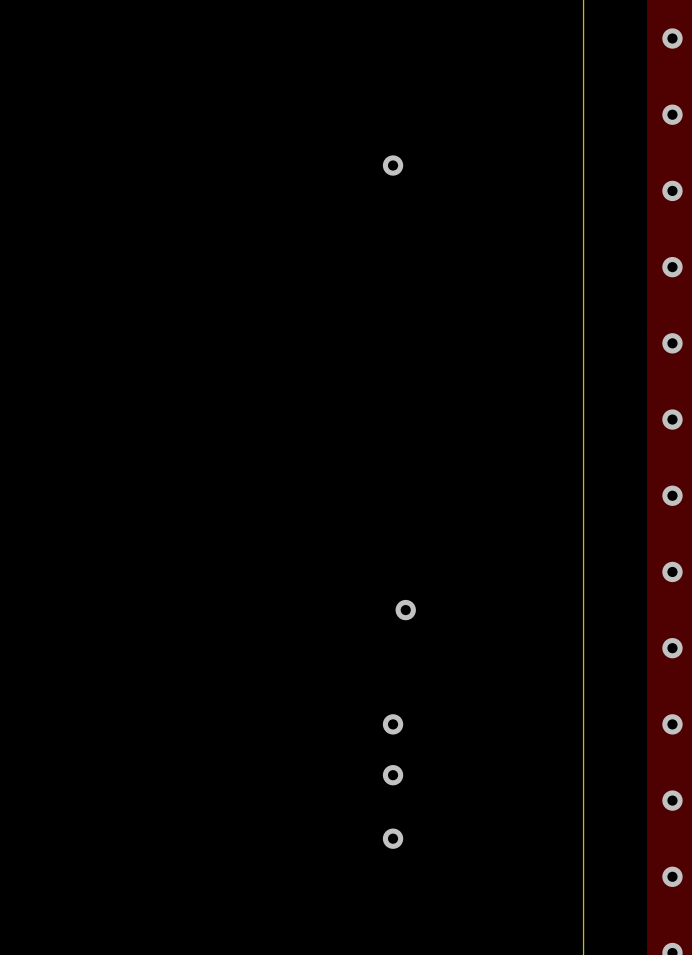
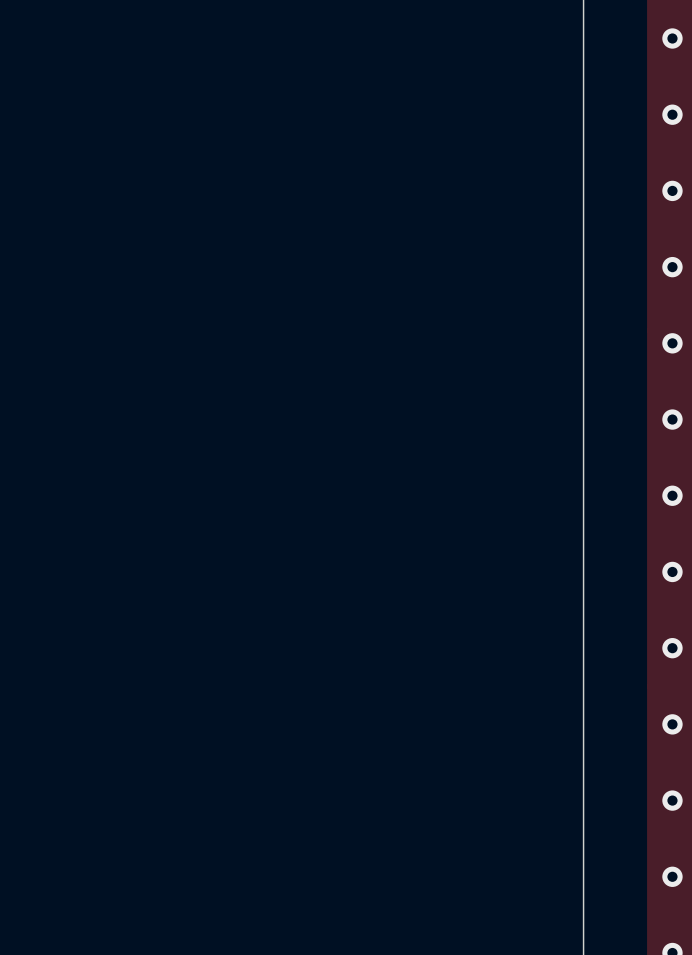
via: (393, 165) -> none
via: (405, 610) -> none
via: (393, 724) -> none
via: (393, 775) -> none
via: (393, 838) -> none

